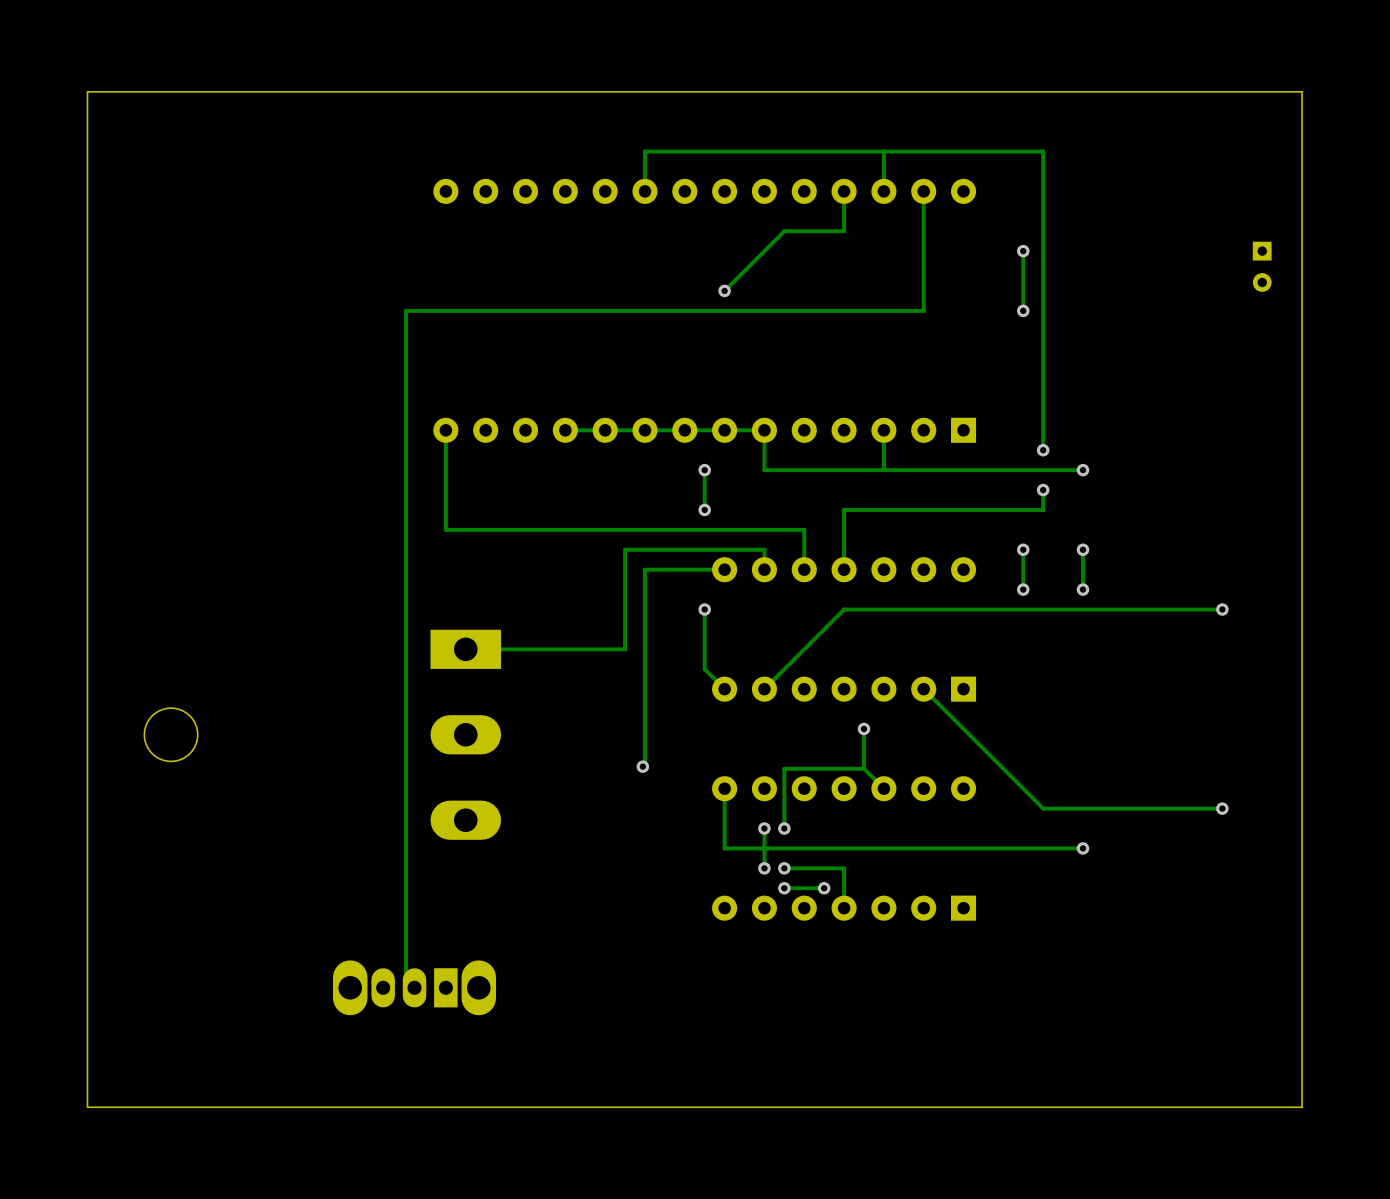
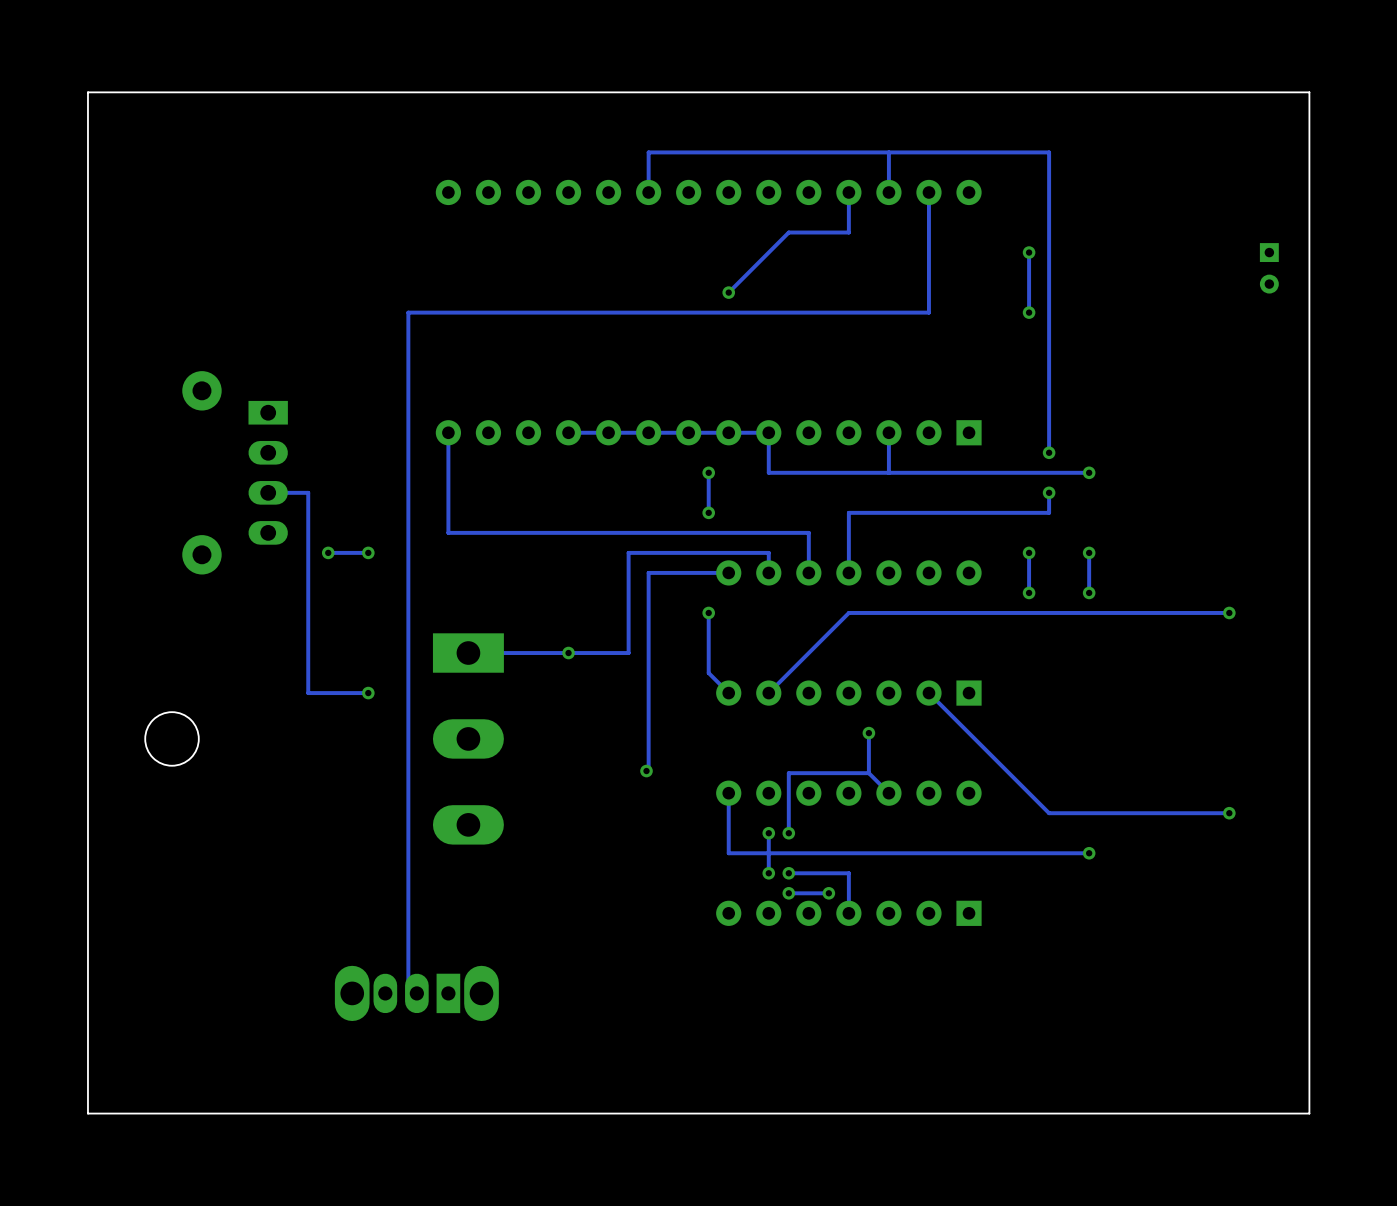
part: none -> (235, 472)
track: none -> (268, 492) (308, 492) (308, 693) (368, 693)
via: none -> (328, 552)
track: none -> (368, 552) (328, 552)
via: none -> (368, 552)
via: none -> (568, 653)
via: none -> (368, 693)

